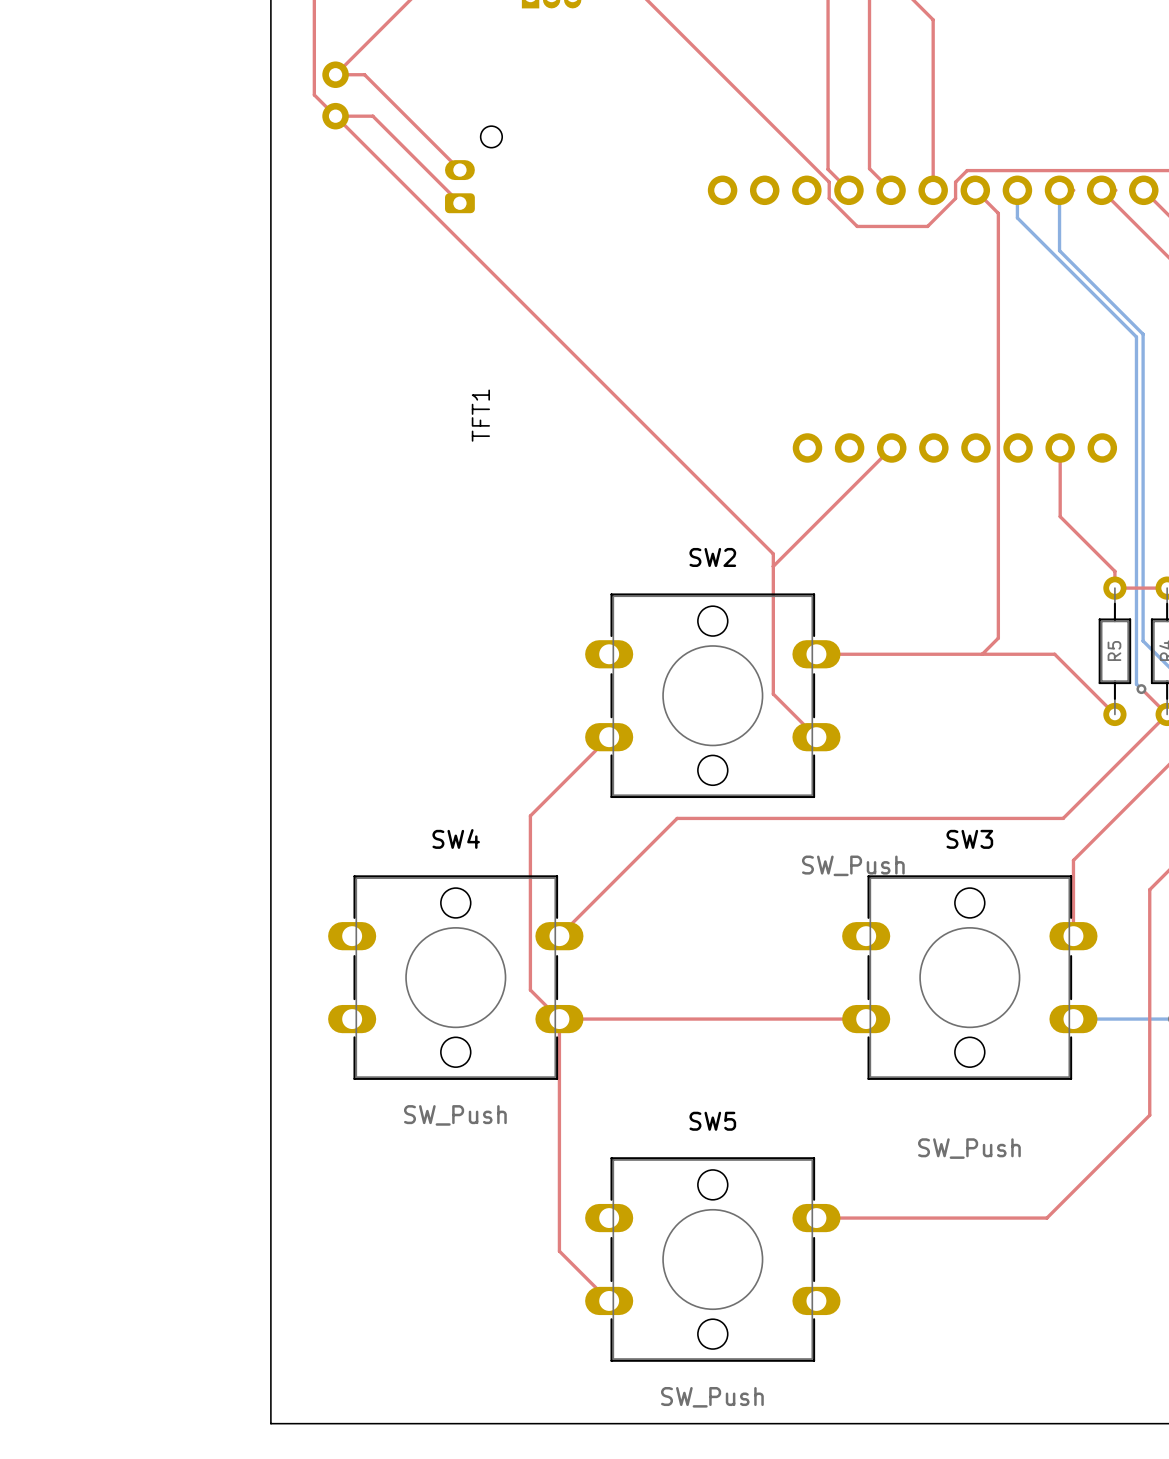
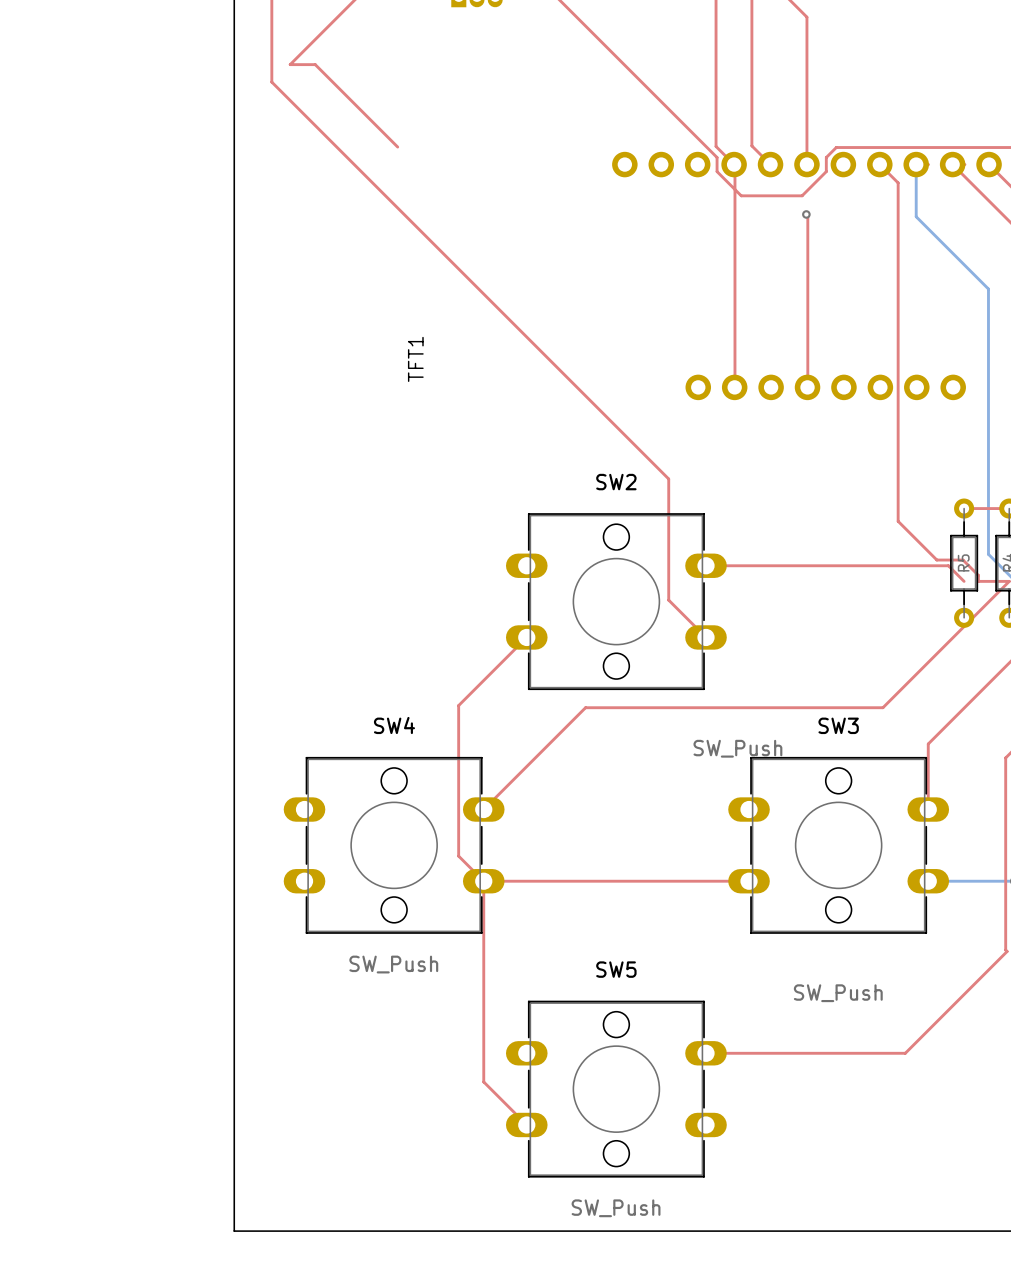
part: (335, 95) -> none
top track: (335, 116) (372, 116) (459, 203) -> none
part: (473, 169) -> none
top track: (975, 190) (998, 213) (998, 638) (982, 654) -> none
bottom track: (1017, 190) (1017, 217) (1136, 336) (1136, 684) (1141, 689) -> none
top track: none -> (734, 165) (734, 379)
top track: none -> (806, 214) (807, 379) (801, 379)
via: none -> (806, 214)
top track: (890, 447) (891, 447) (773, 566) -> none
top track: (1060, 447) (1060, 516) (1114, 571) (1114, 588) -> none
top track: (1054, 654) (1114, 714) -> (912, 565) (948, 565) (964, 581)
top track: (1141, 689) (1167, 714) (1063, 818) (1021, 818) -> (879, 164) (898, 182) (898, 521) (936, 560) (963, 560) (978, 575) (978, 581) (1009, 581) (882, 707)
via: (1141, 689) -> none
top track: (1163, 876) (1149, 889) (1149, 1115) -> (1005, 757) (1007, 951) (994, 964)

